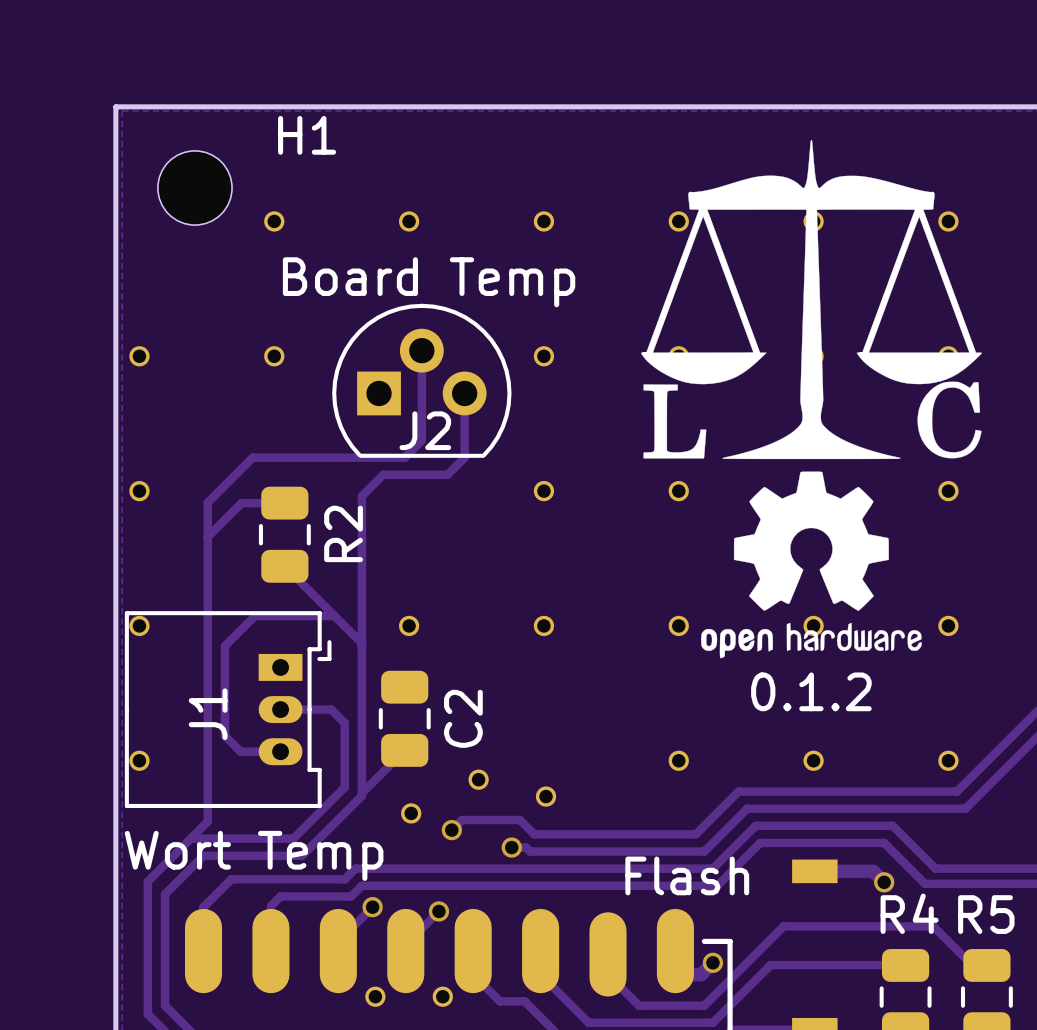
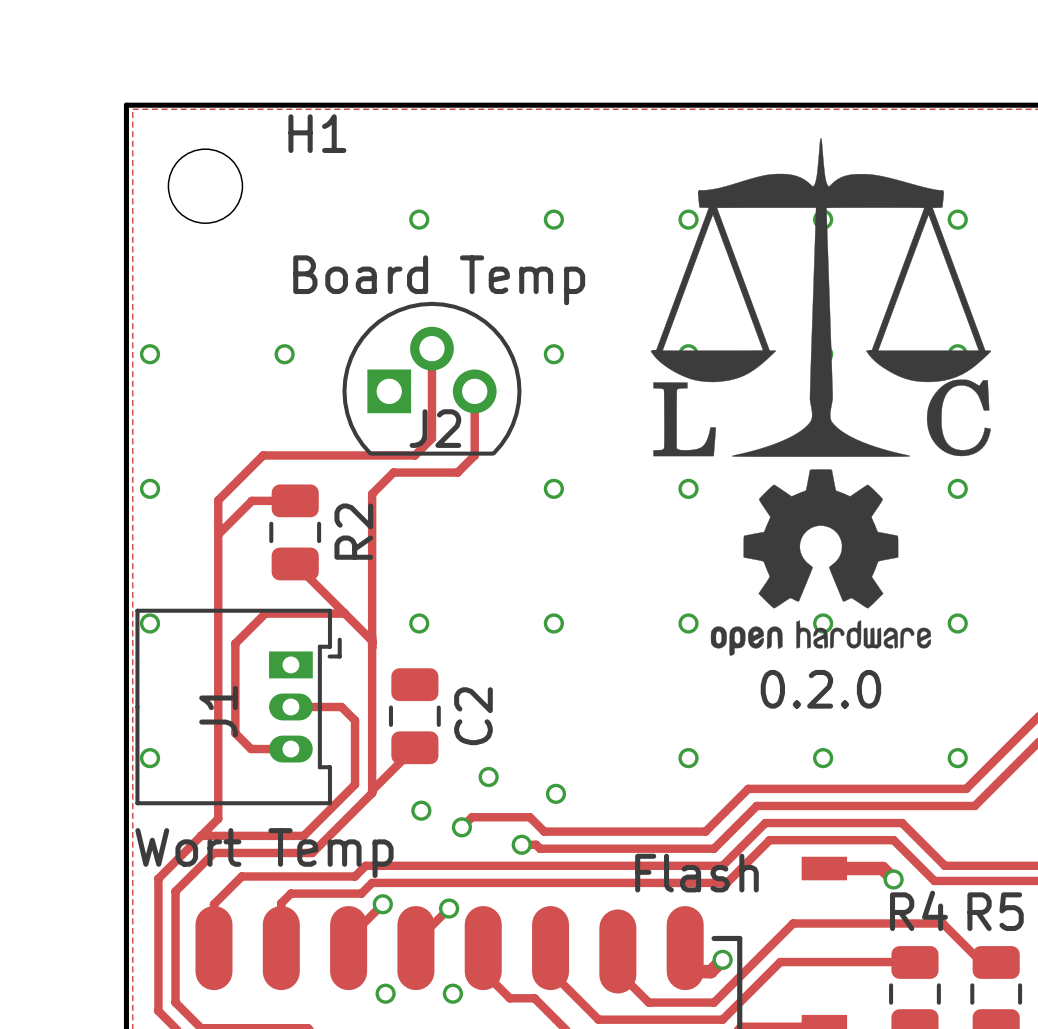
part: (274, 221) -> none
text: 0.1.2 (811, 691) -> 0.2.0 (820, 689)

